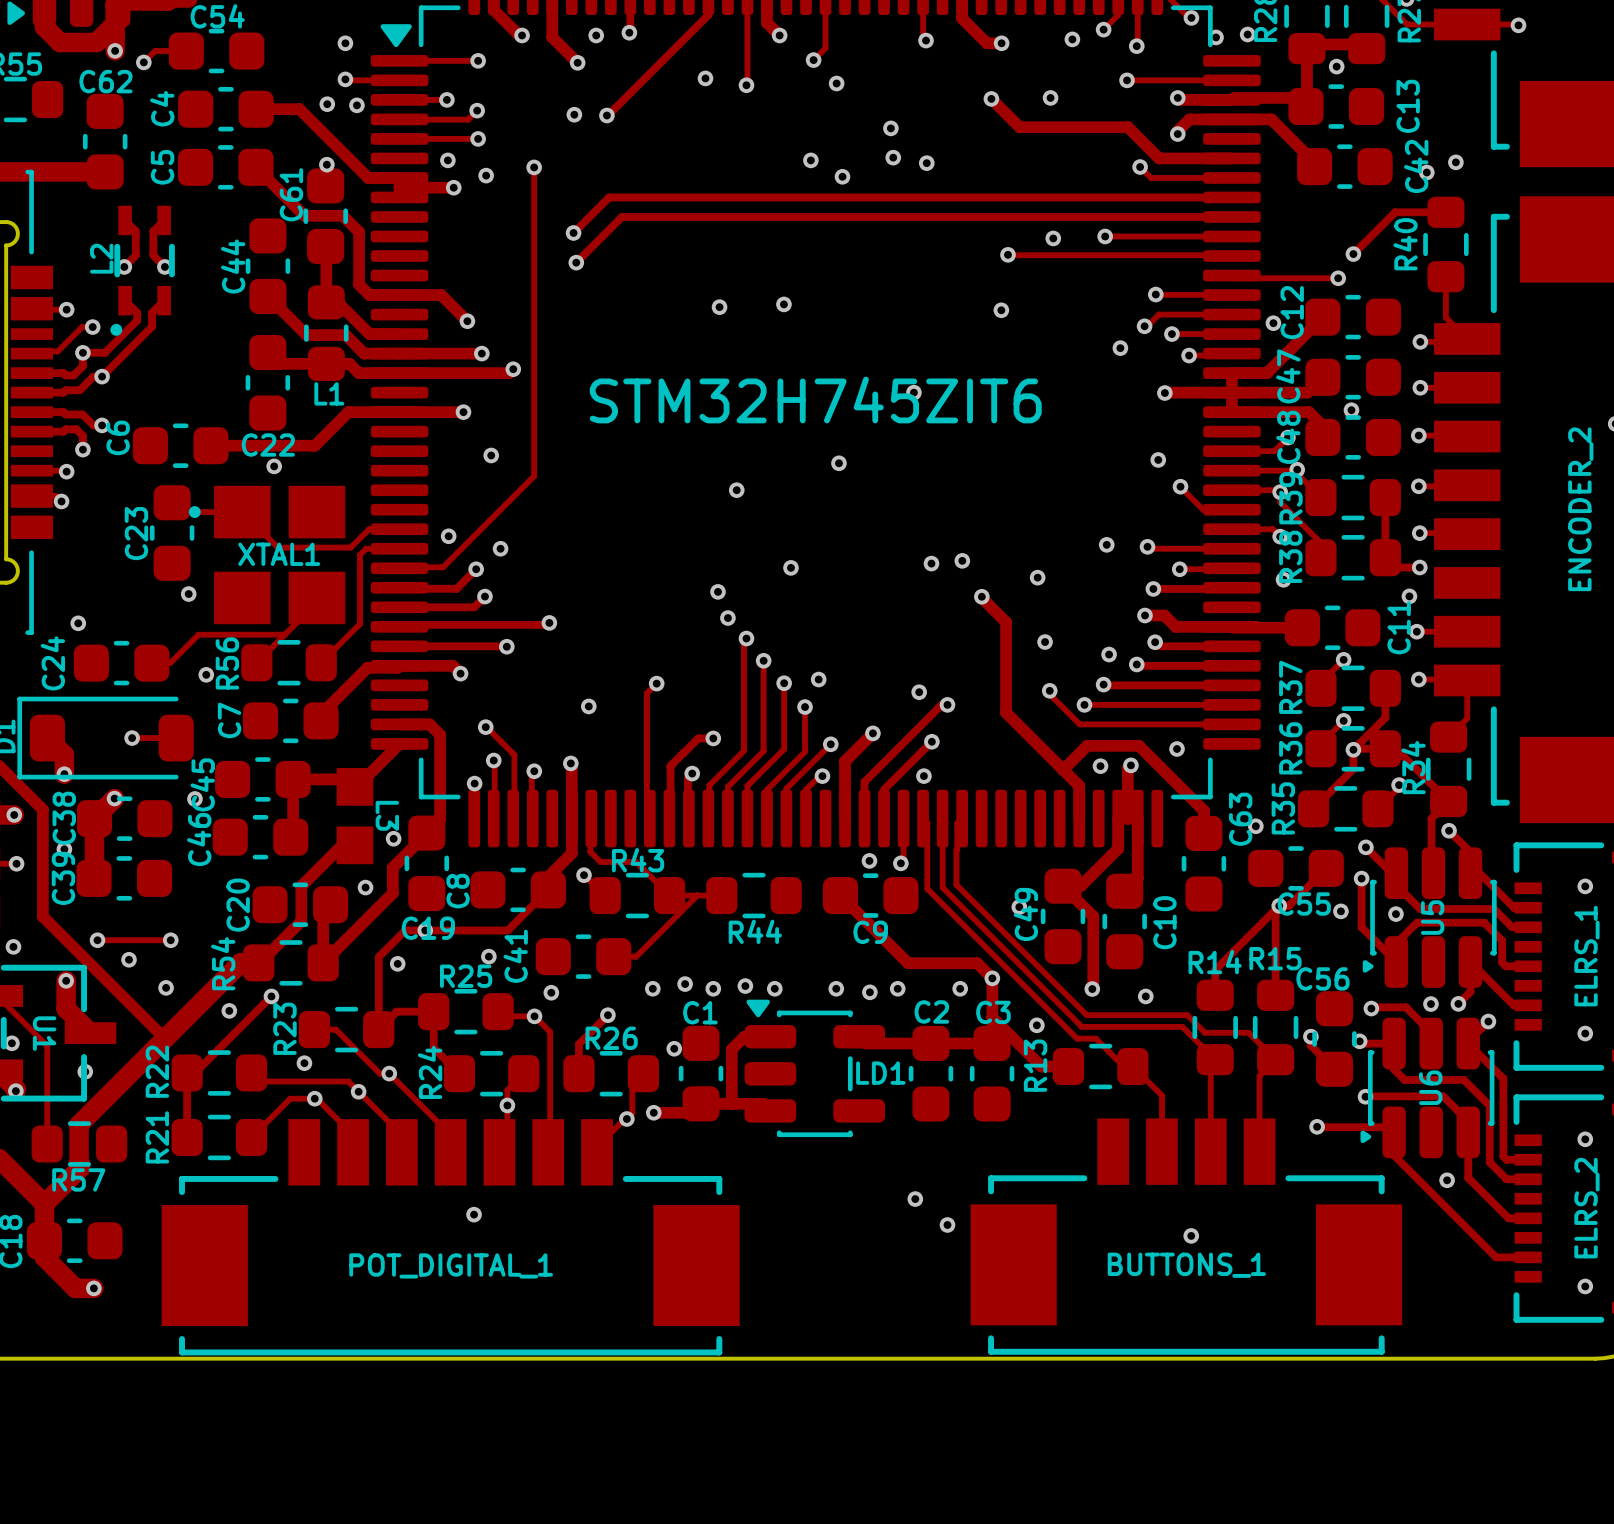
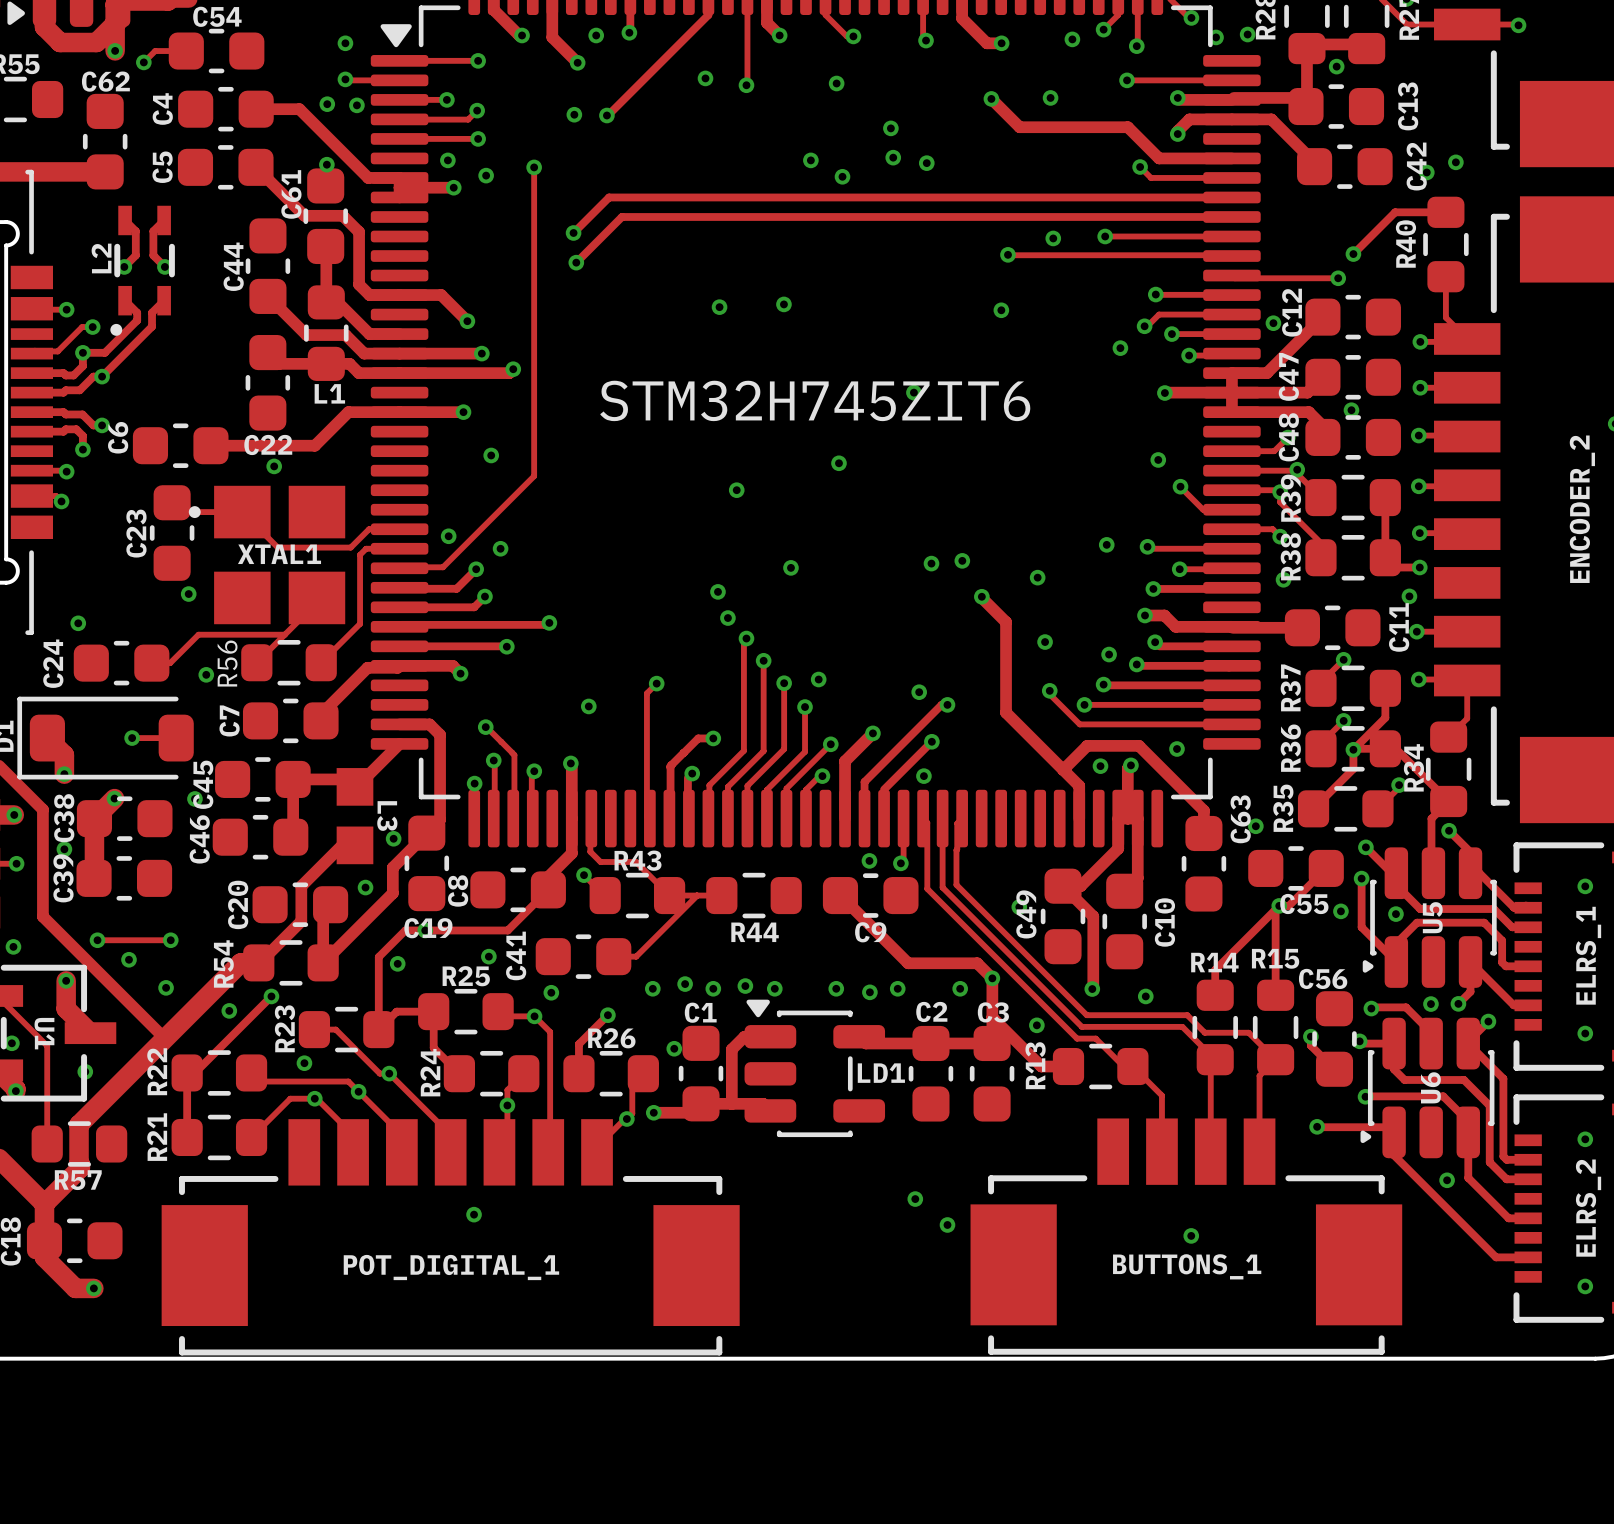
track: (825, 15) (825, 48) (813, 60) -> (825, 15) (846, 36) (853, 36)
via position: (813, 60) -> (853, 36)

